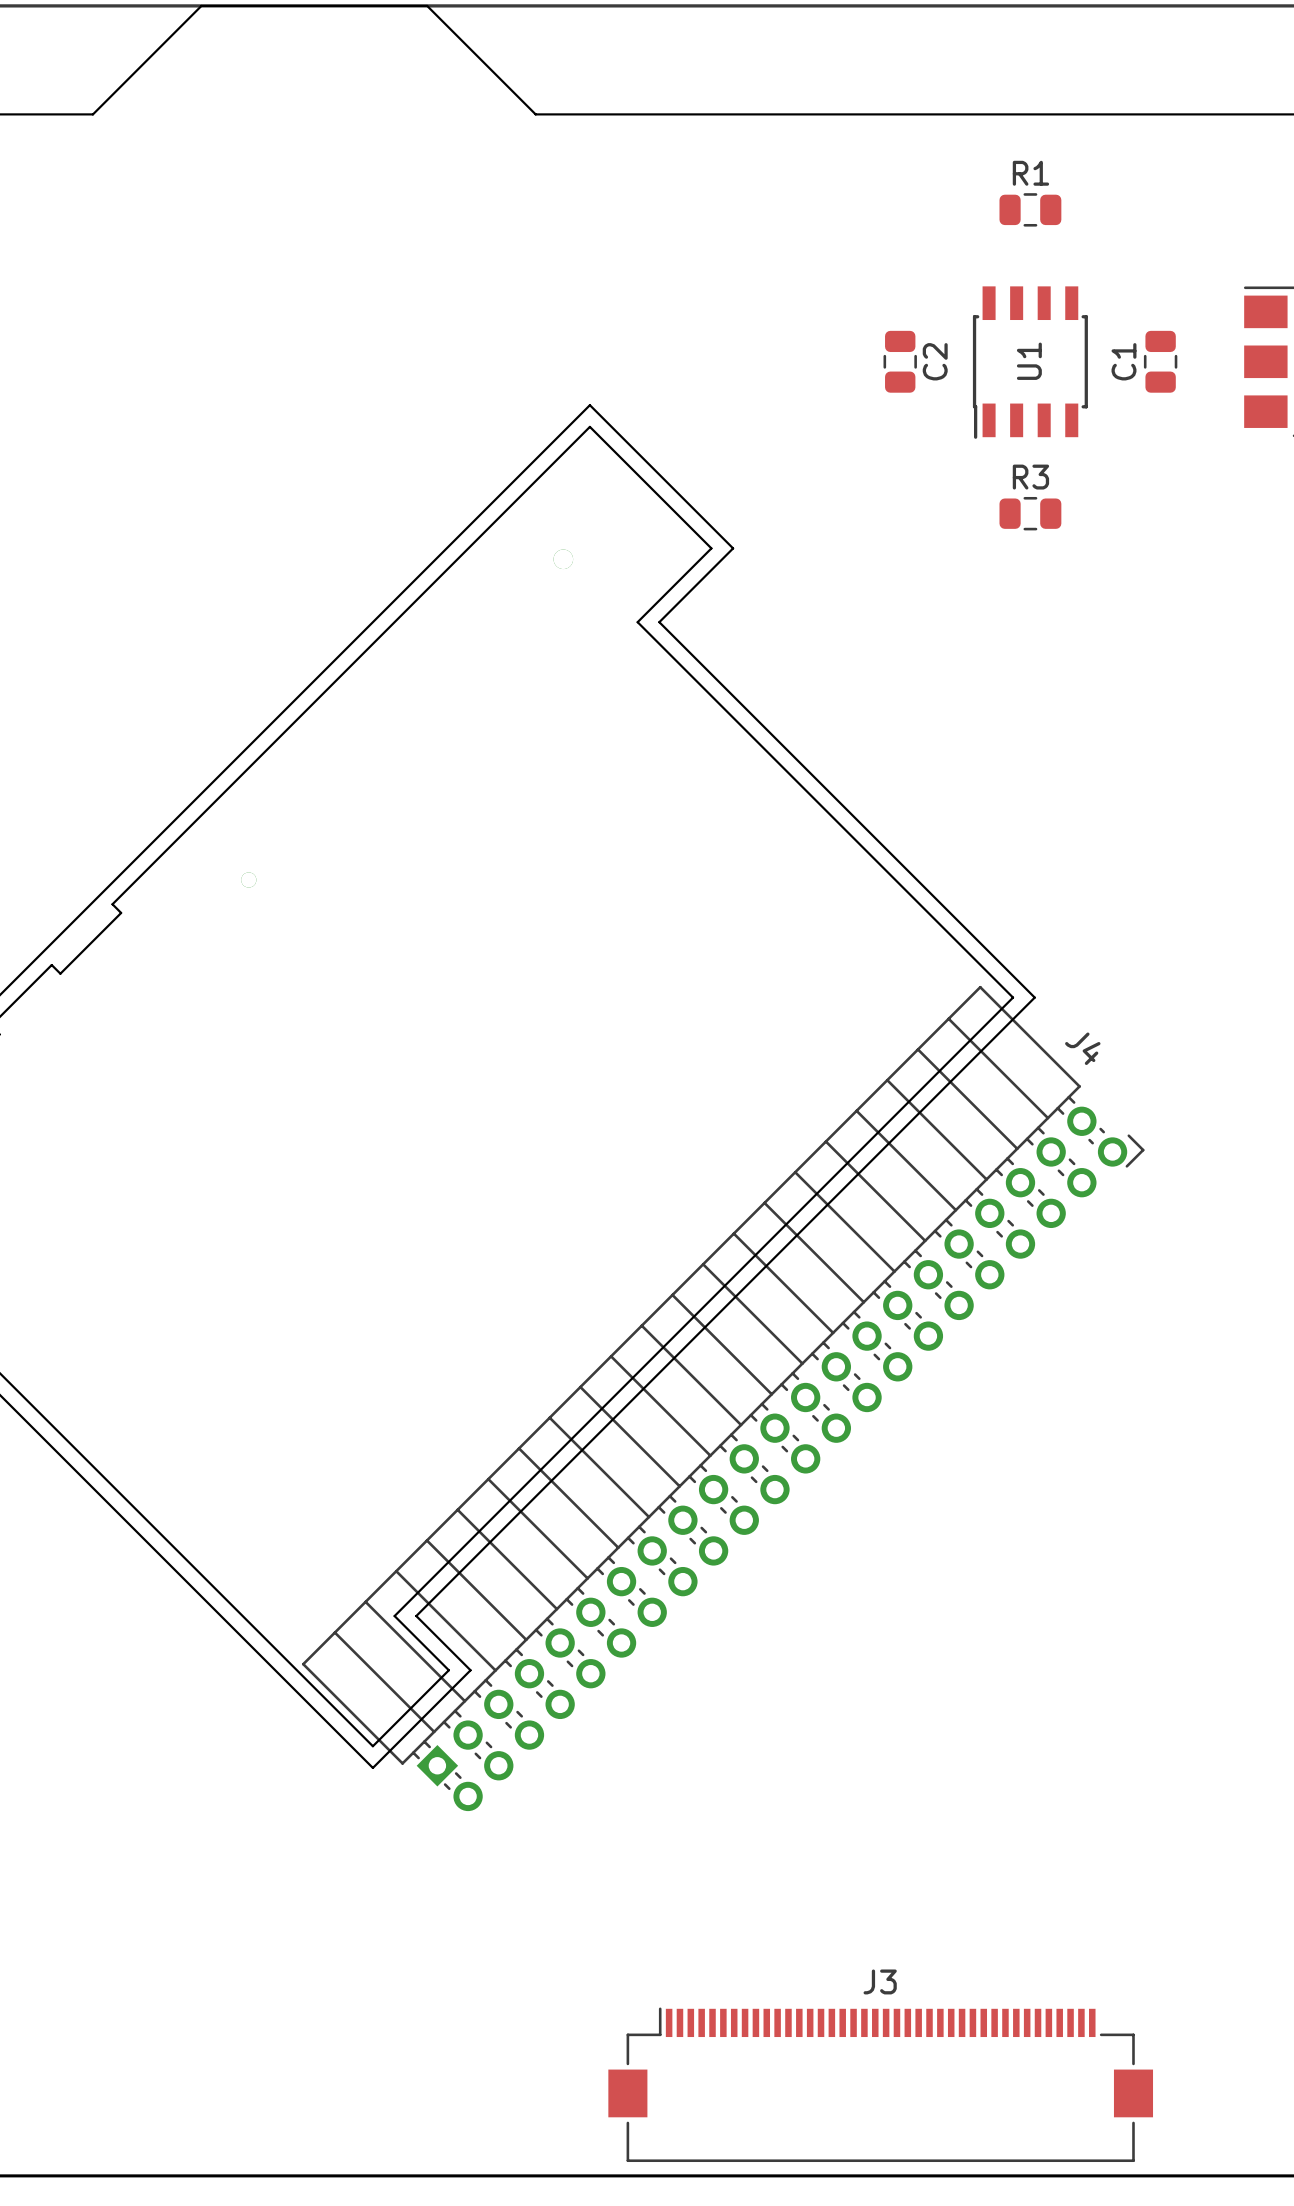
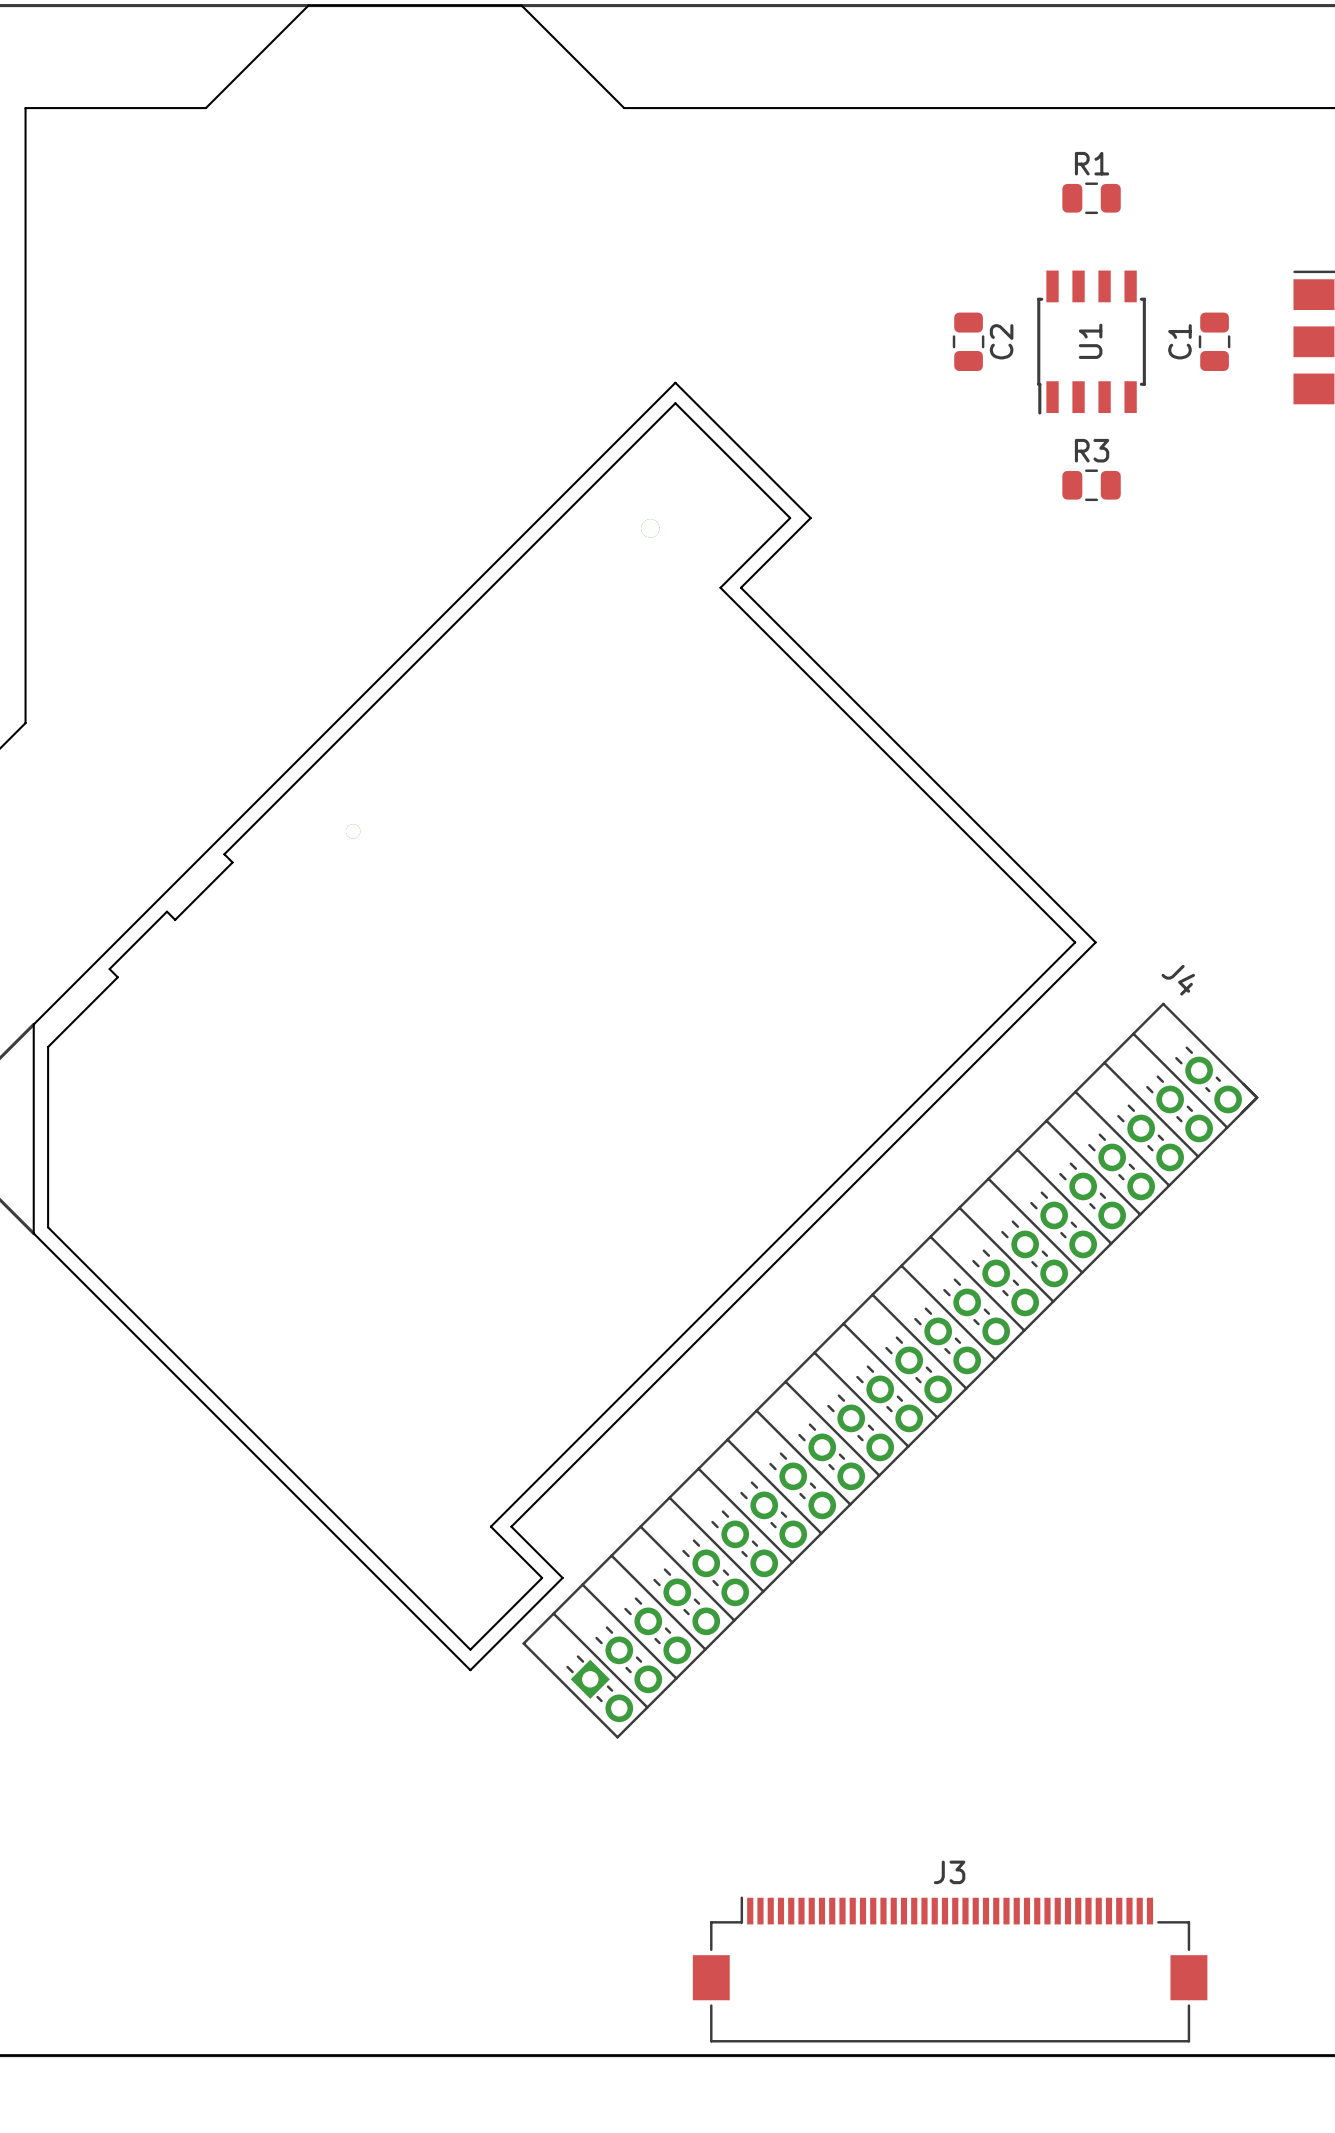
J4 footprint: [301, 985, 1145, 1812] -> [522, 1002, 1259, 1739]
J4 name position: J4 (1082, 1048) -> J4 (1178, 980)

